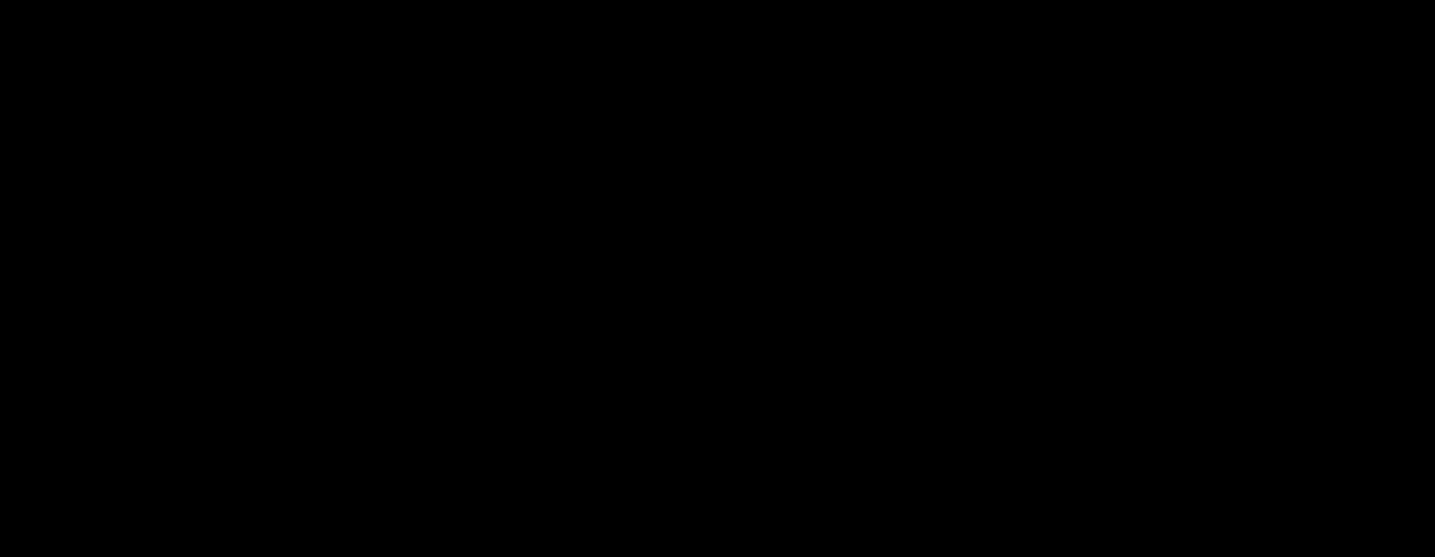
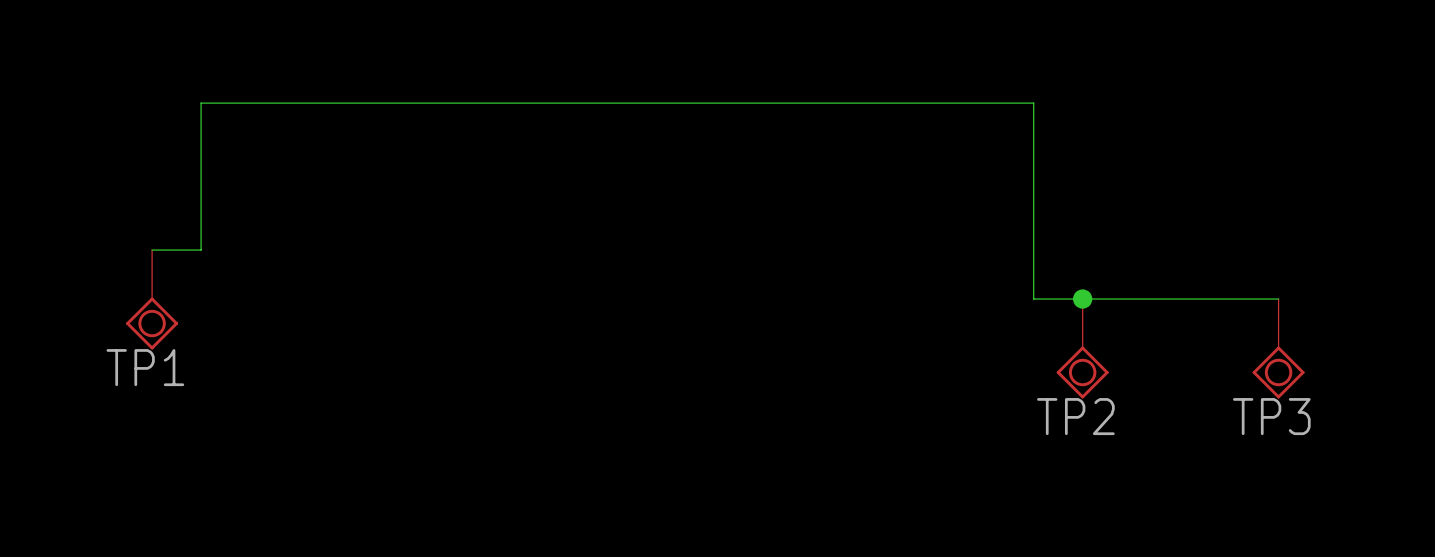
wire: none -> (152, 250) (201, 250) (201, 103) (1033, 103) (1033, 299) (1278, 299)
TP1: none -> (152, 299)
junction: none -> (1082, 299)
TP2: none -> (1082, 348)
TP3: none -> (1278, 348)

